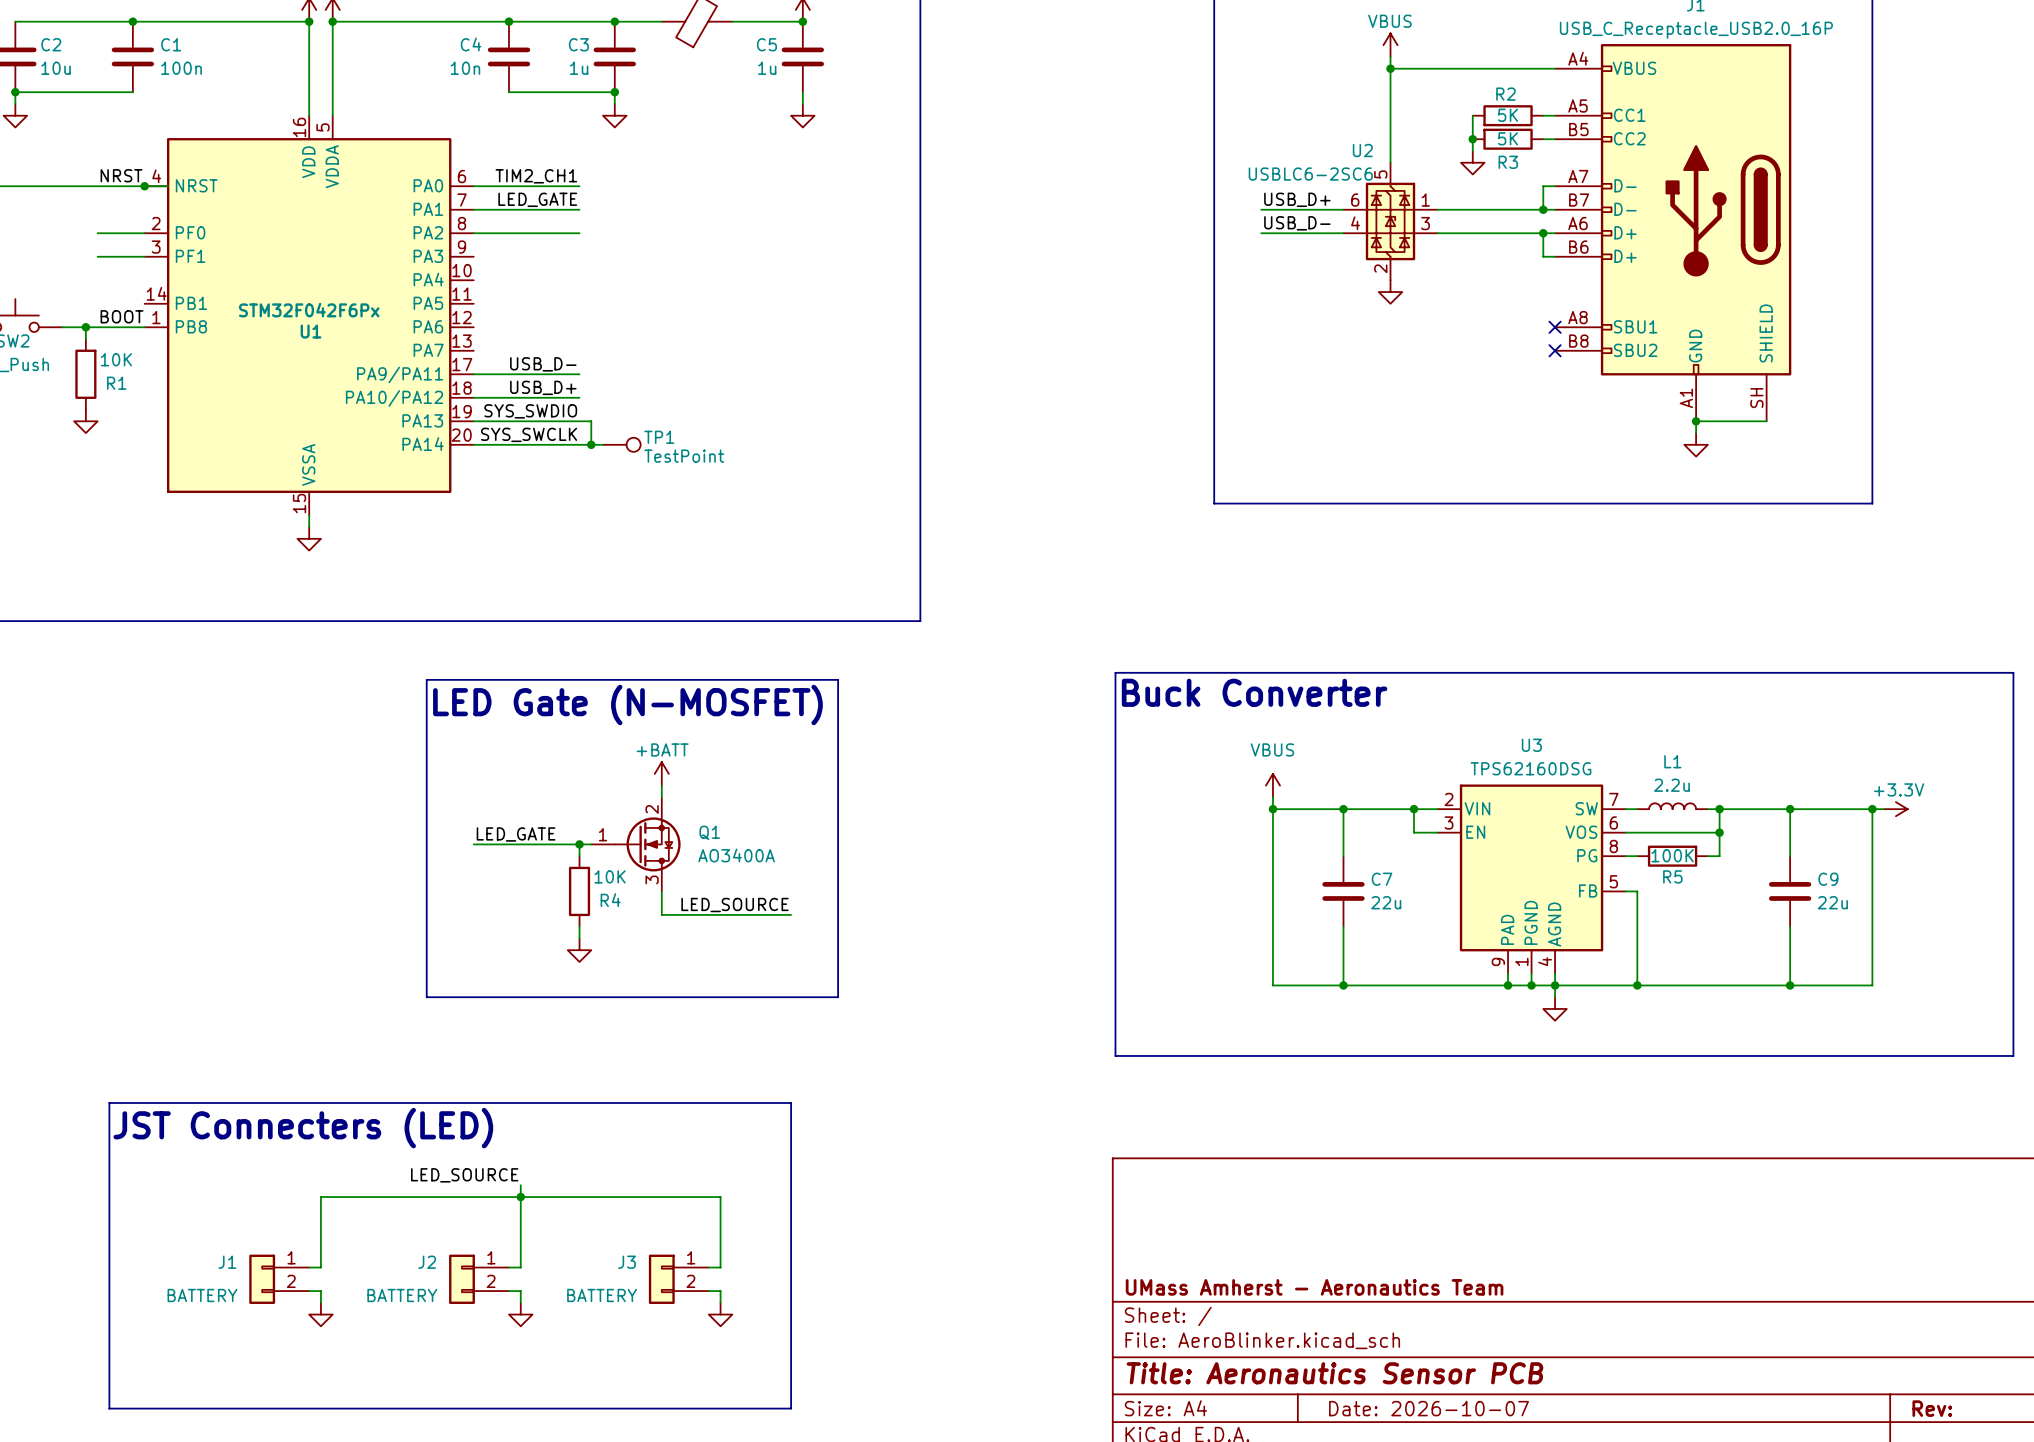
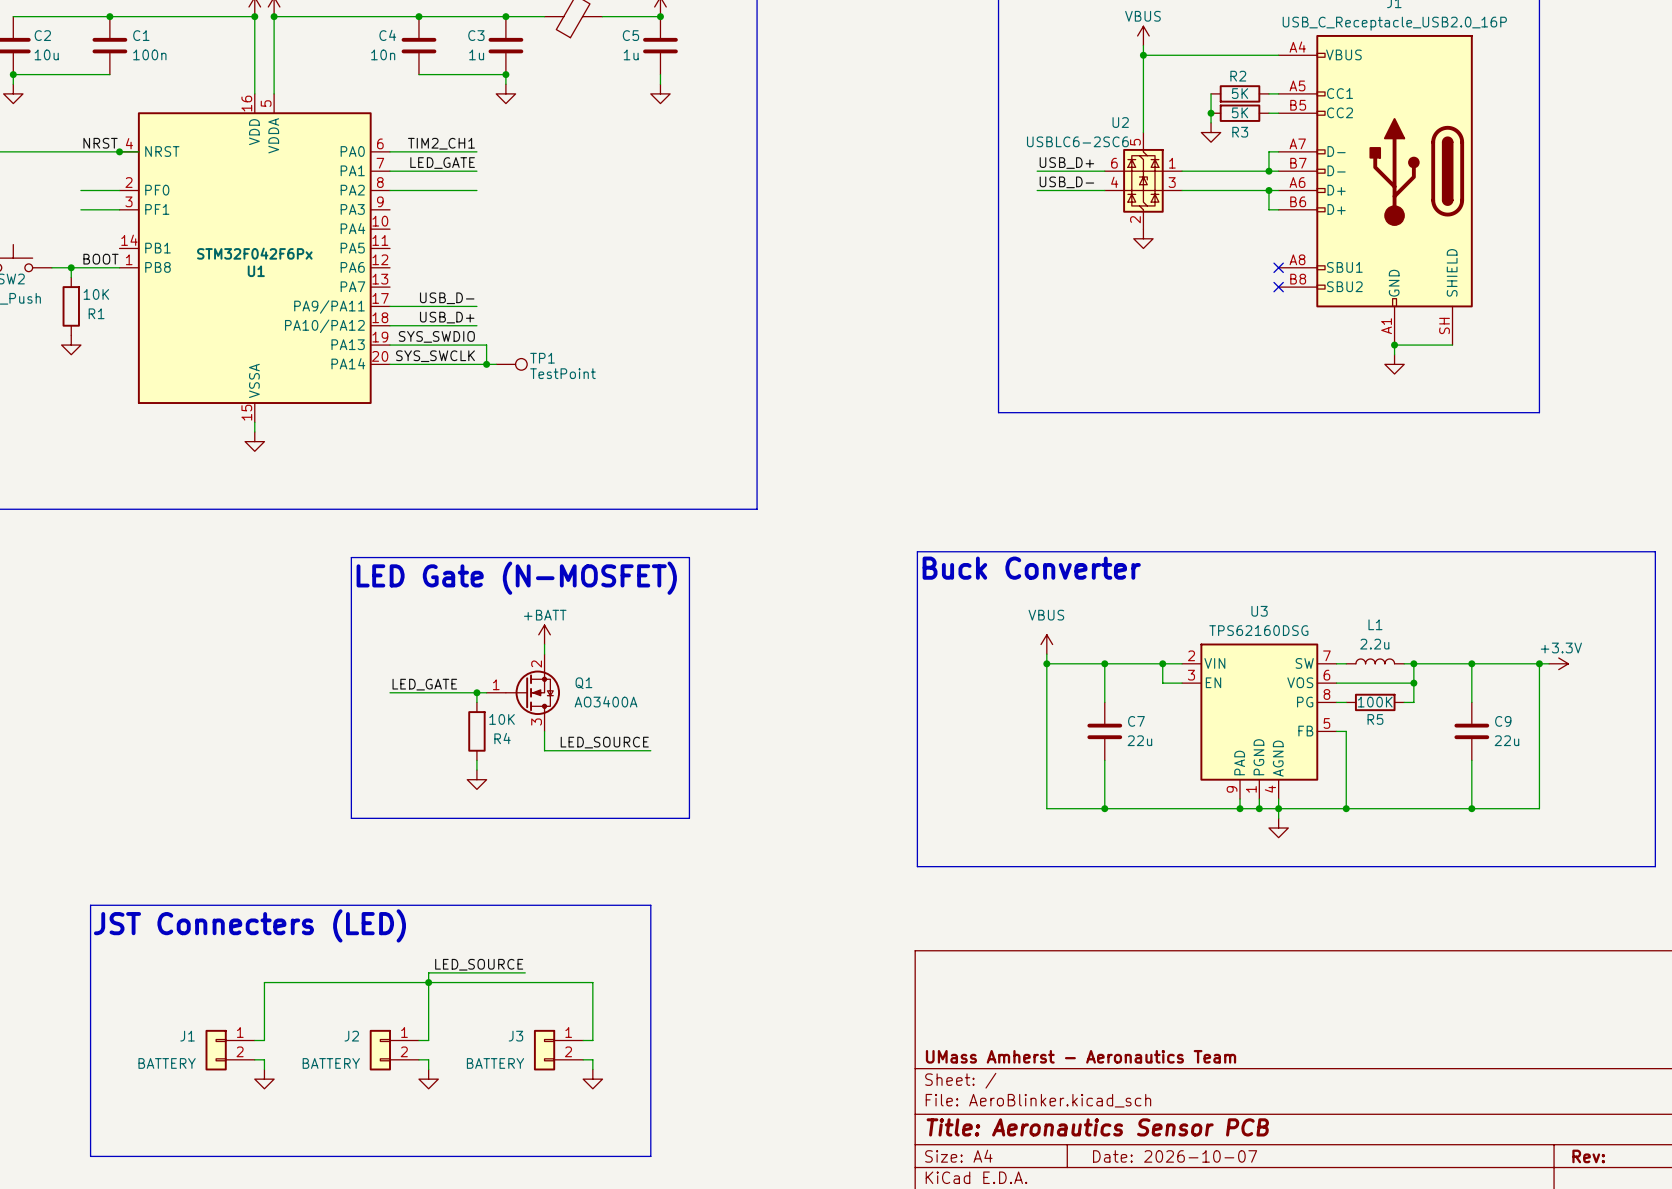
label position: LED_SOURCE (464, 1175) -> LED_SOURCE (479, 964)
wire: none -> (428, 972) (525, 972)

